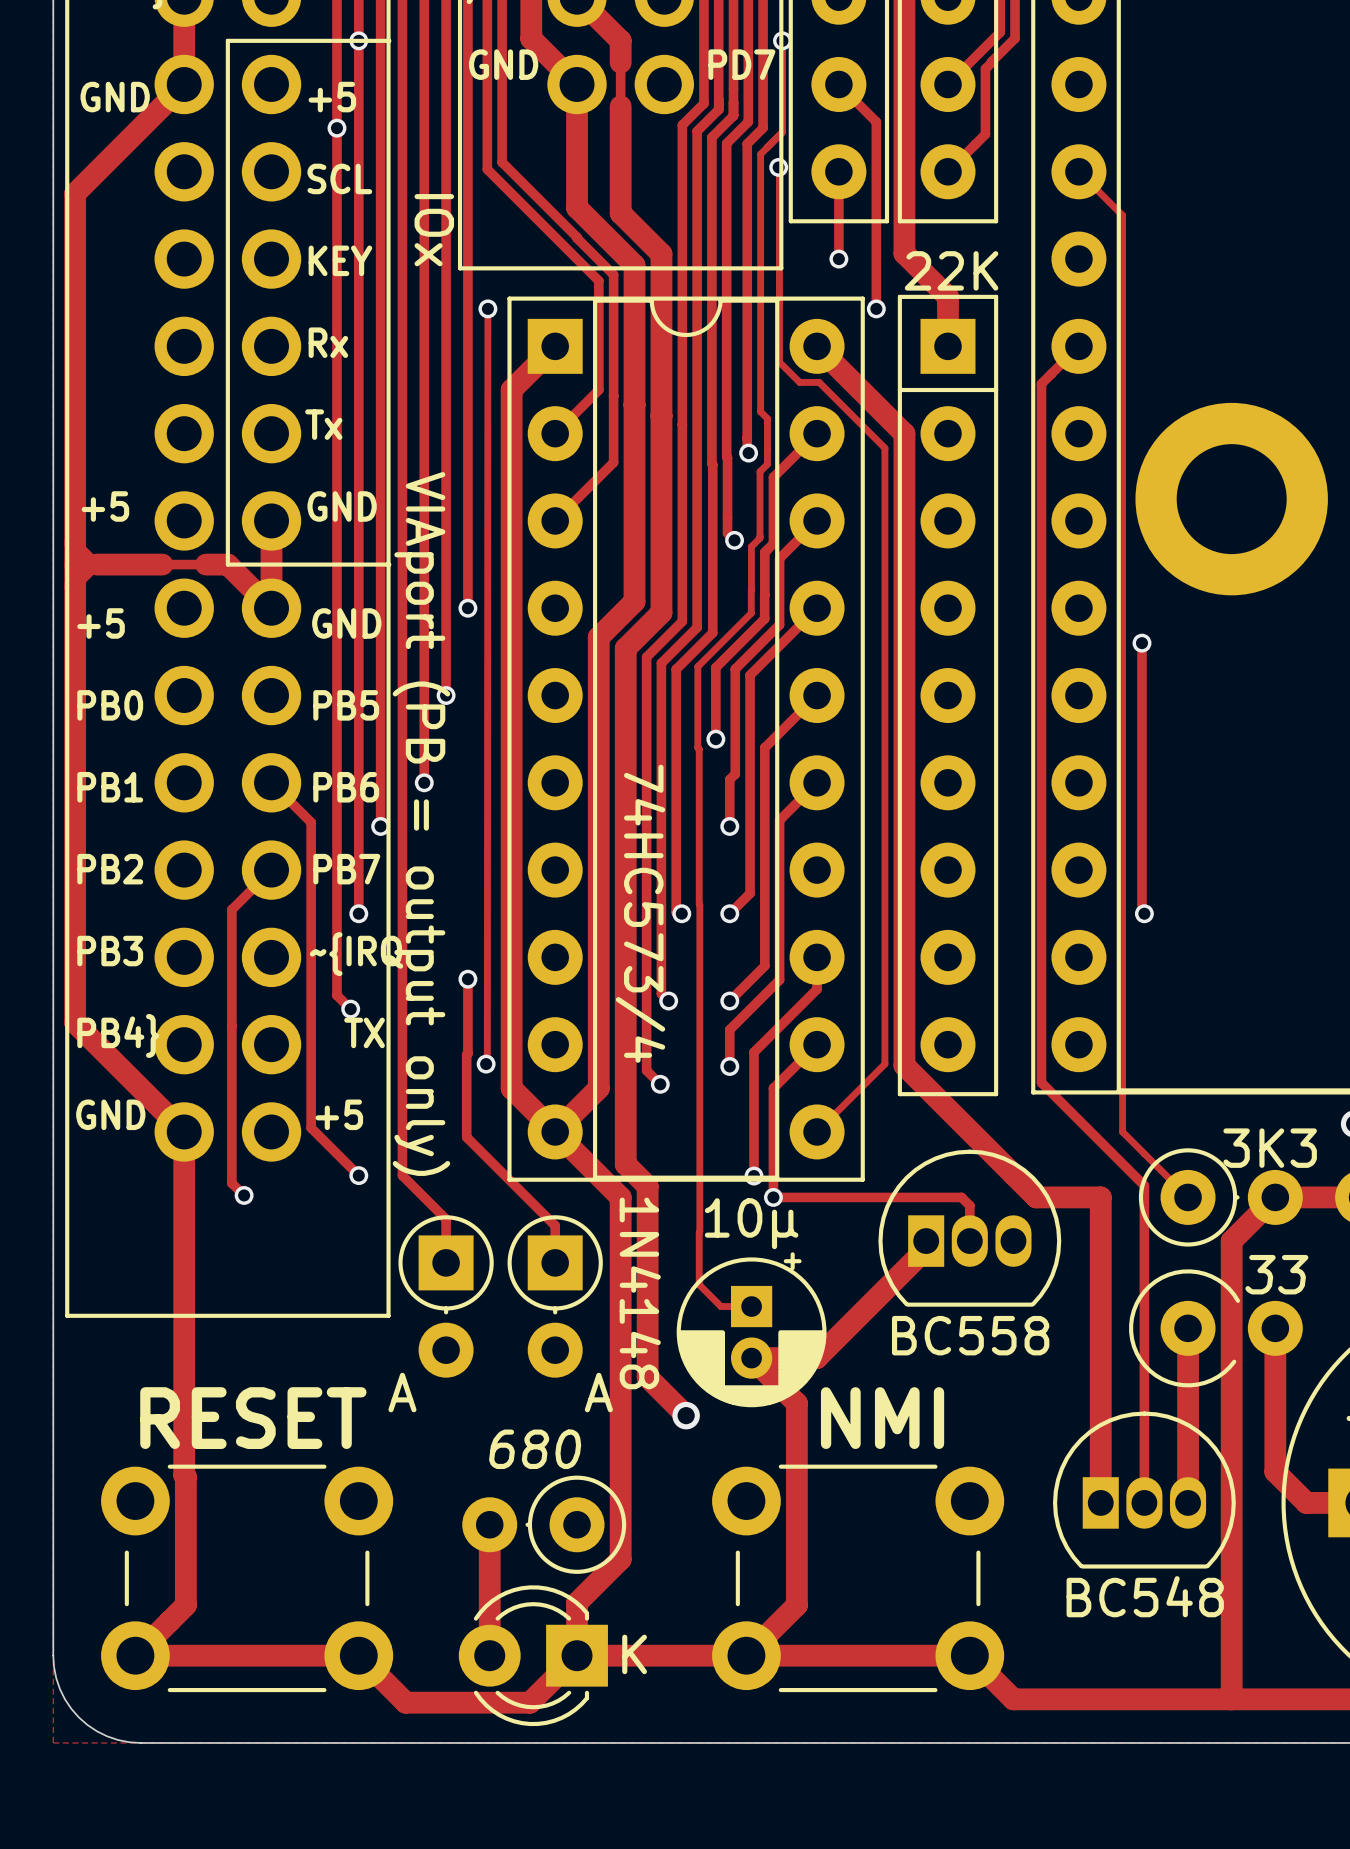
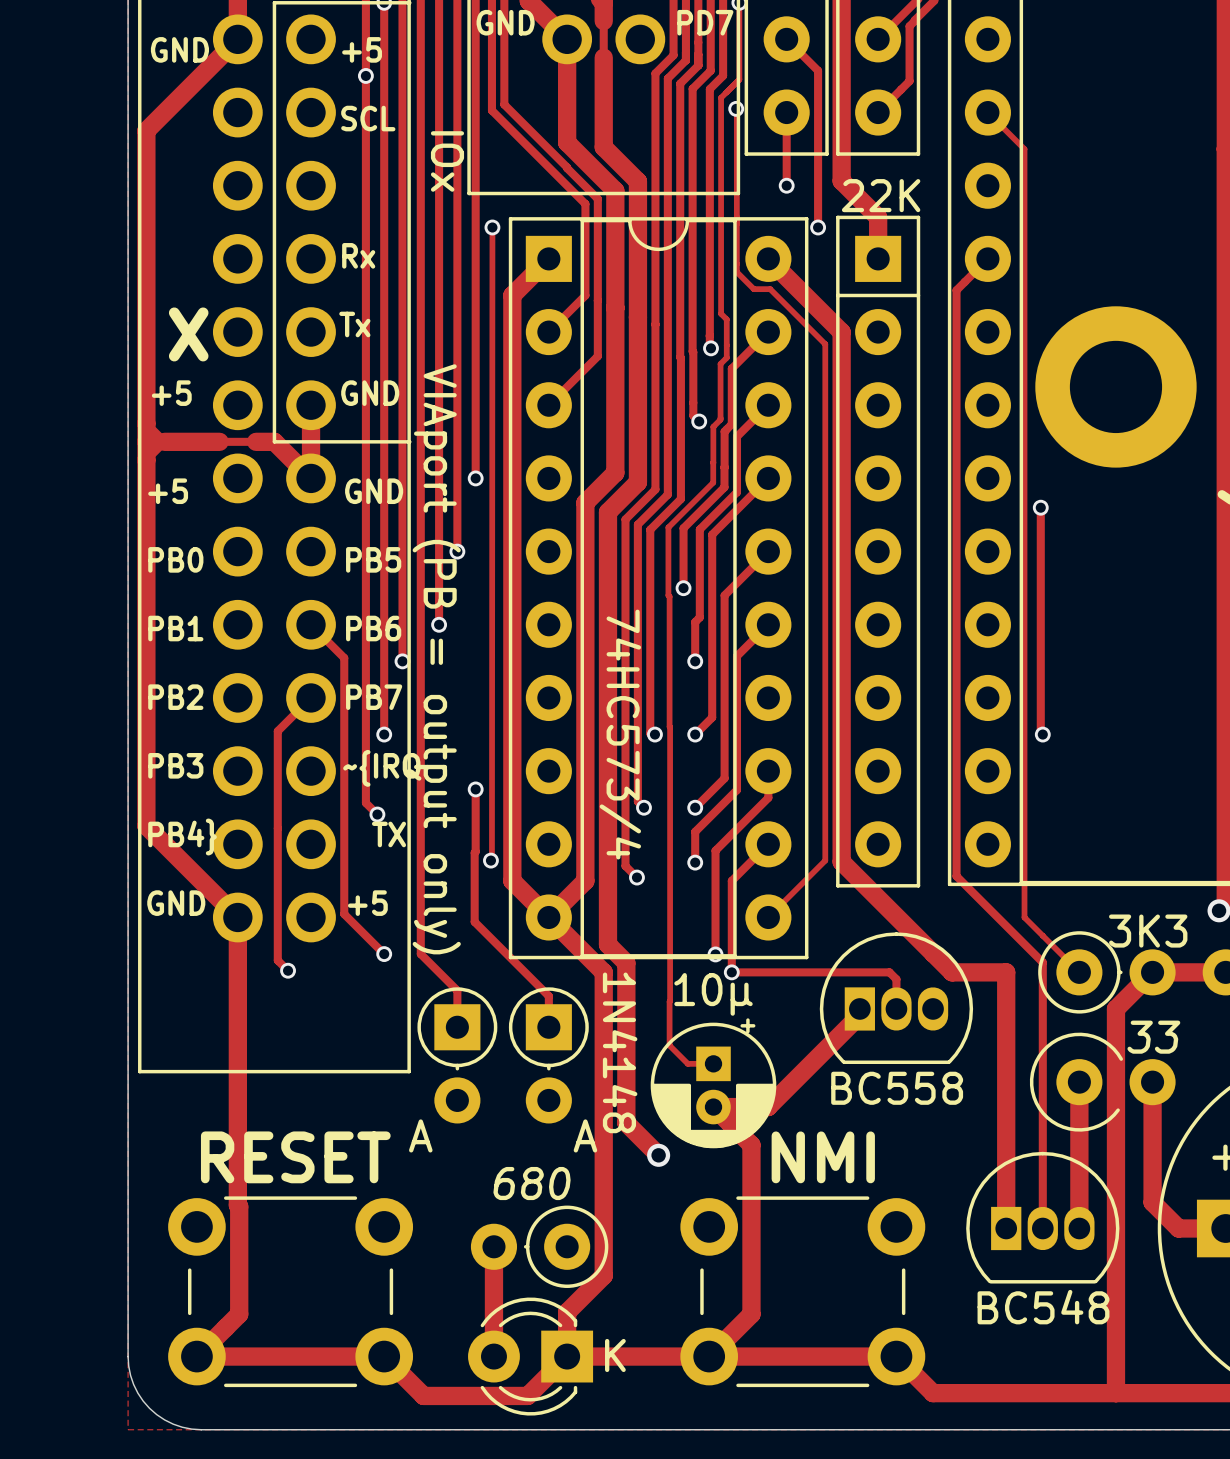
text: KEY (340, 260) -> none
text: none -> X (188, 334)

